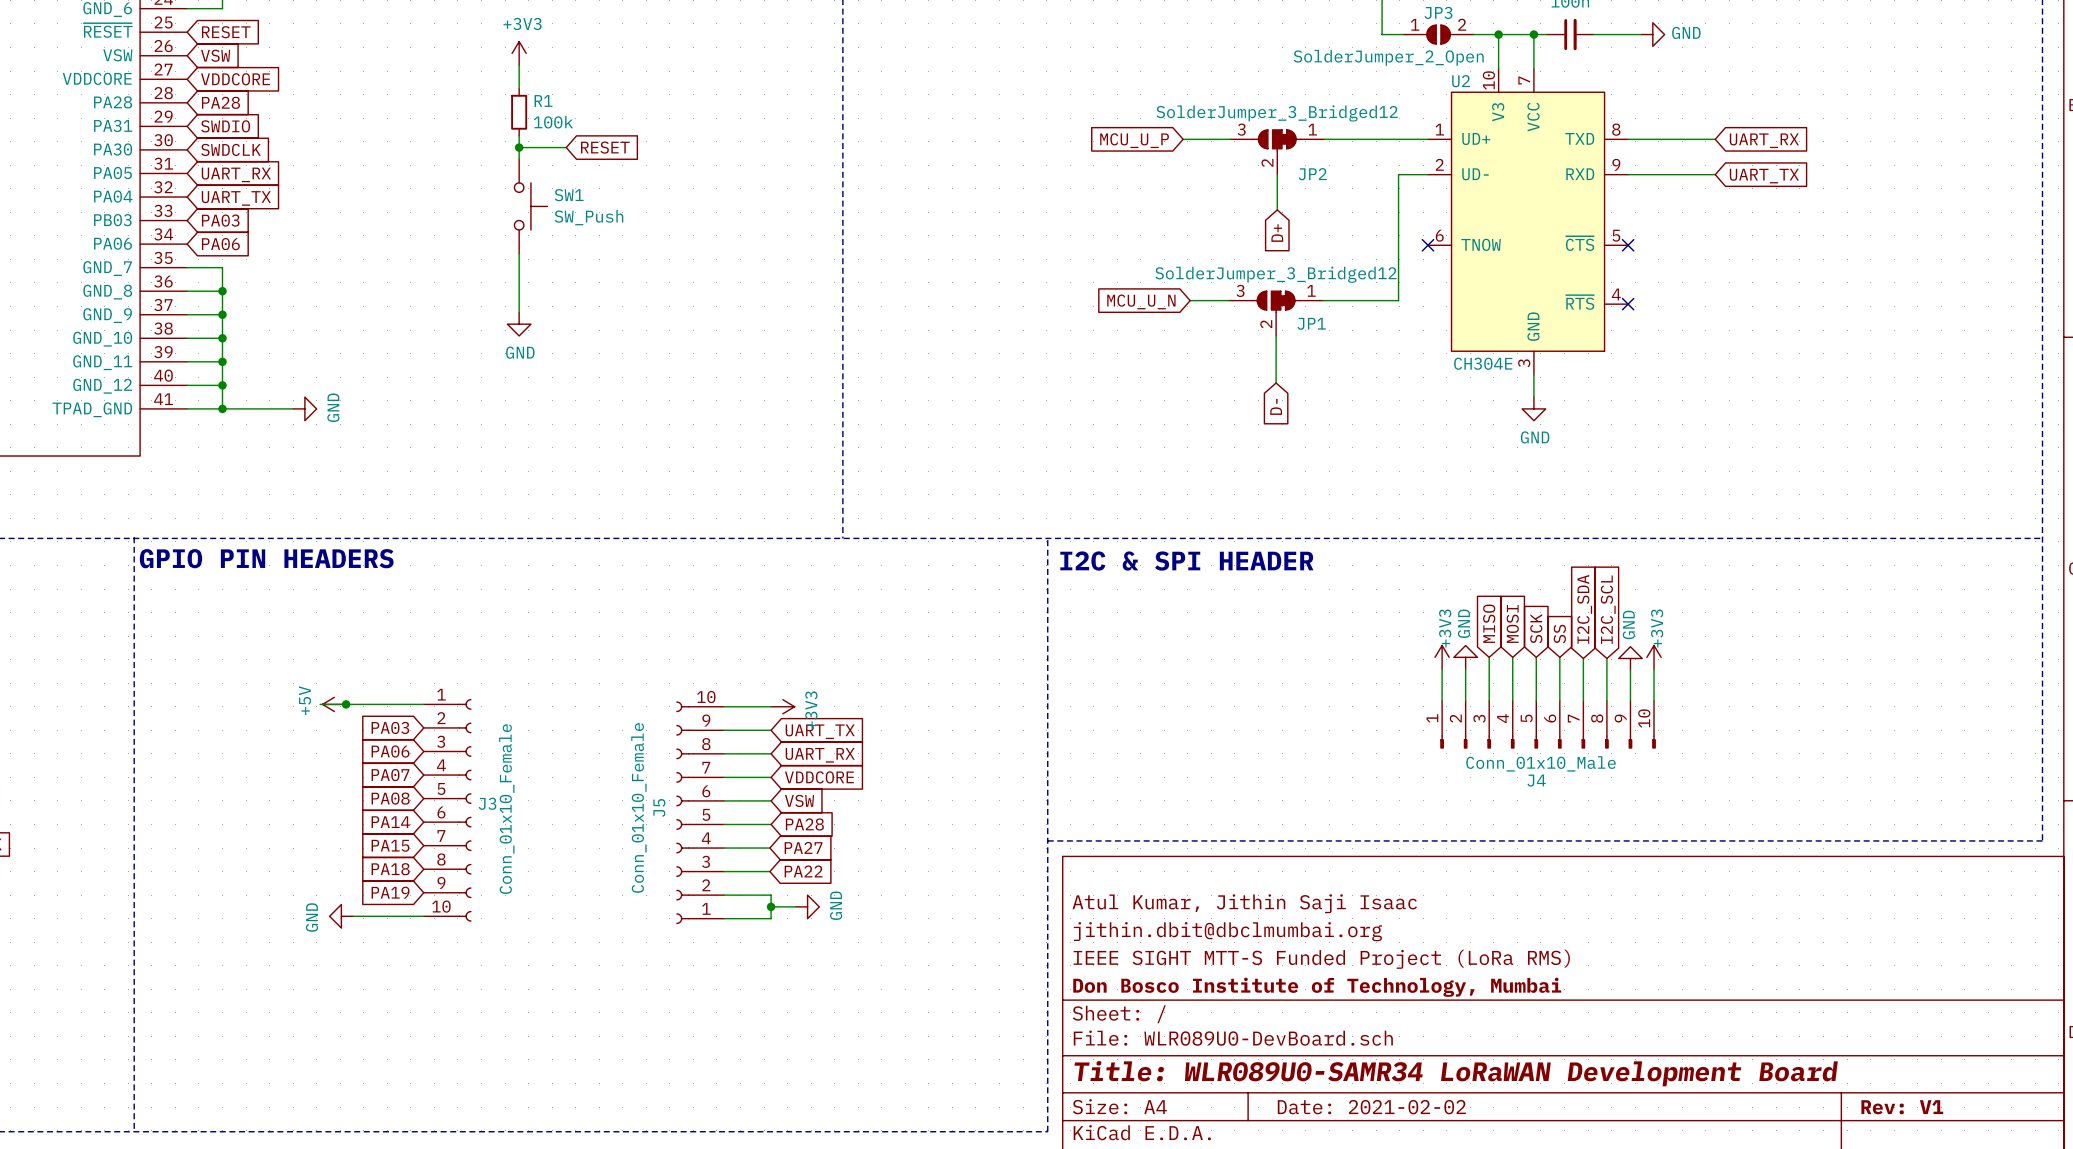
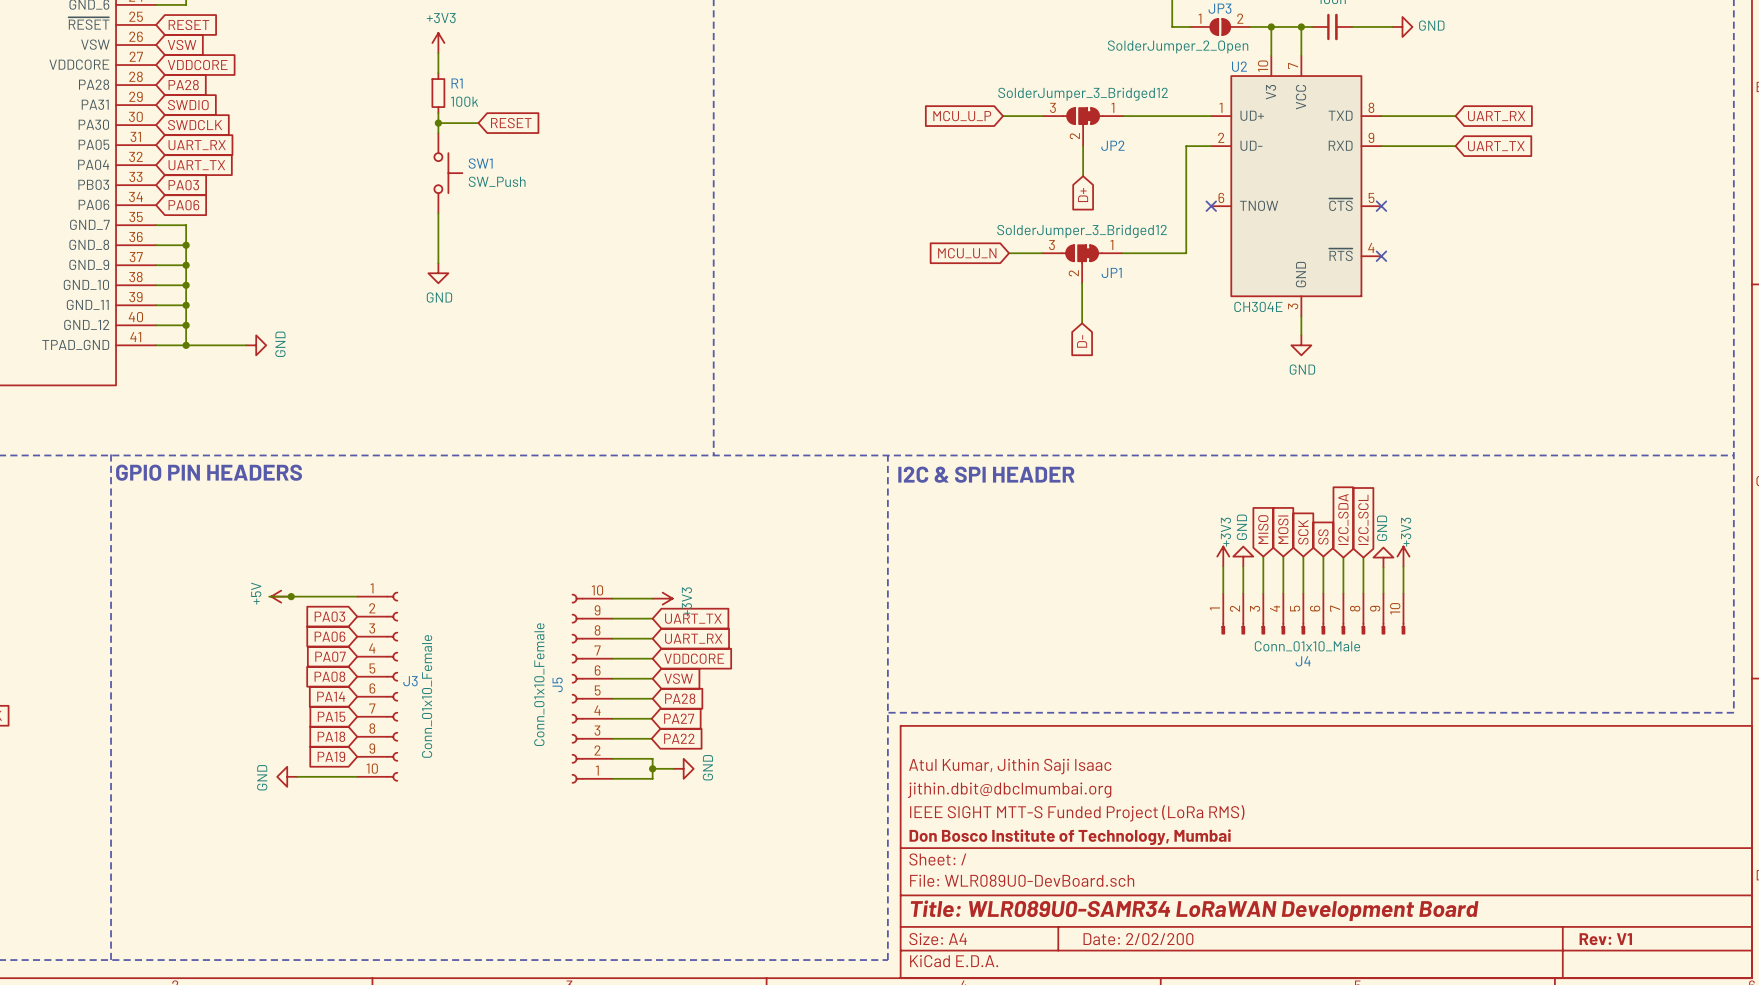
title block: Date: 2021-02-02 (1371, 1107) -> Date: 2/02/200 (1138, 939)

